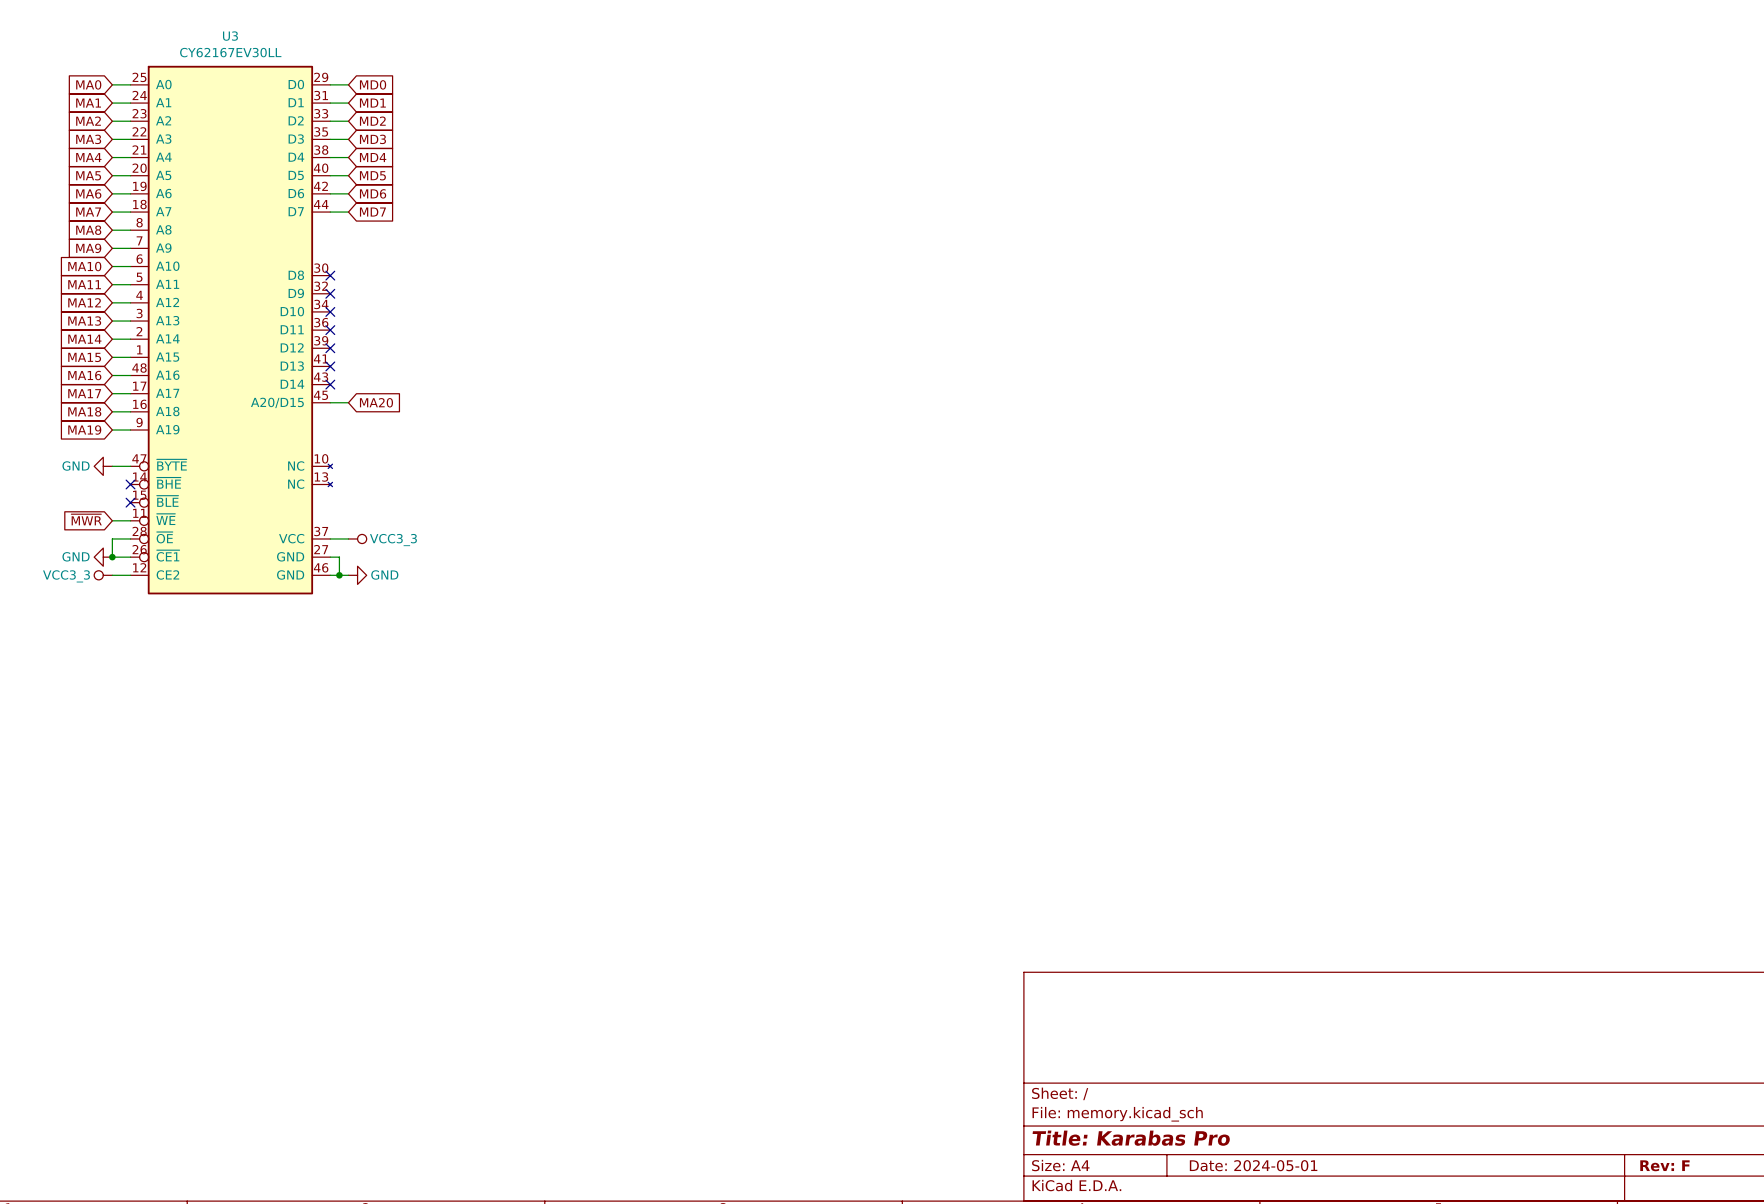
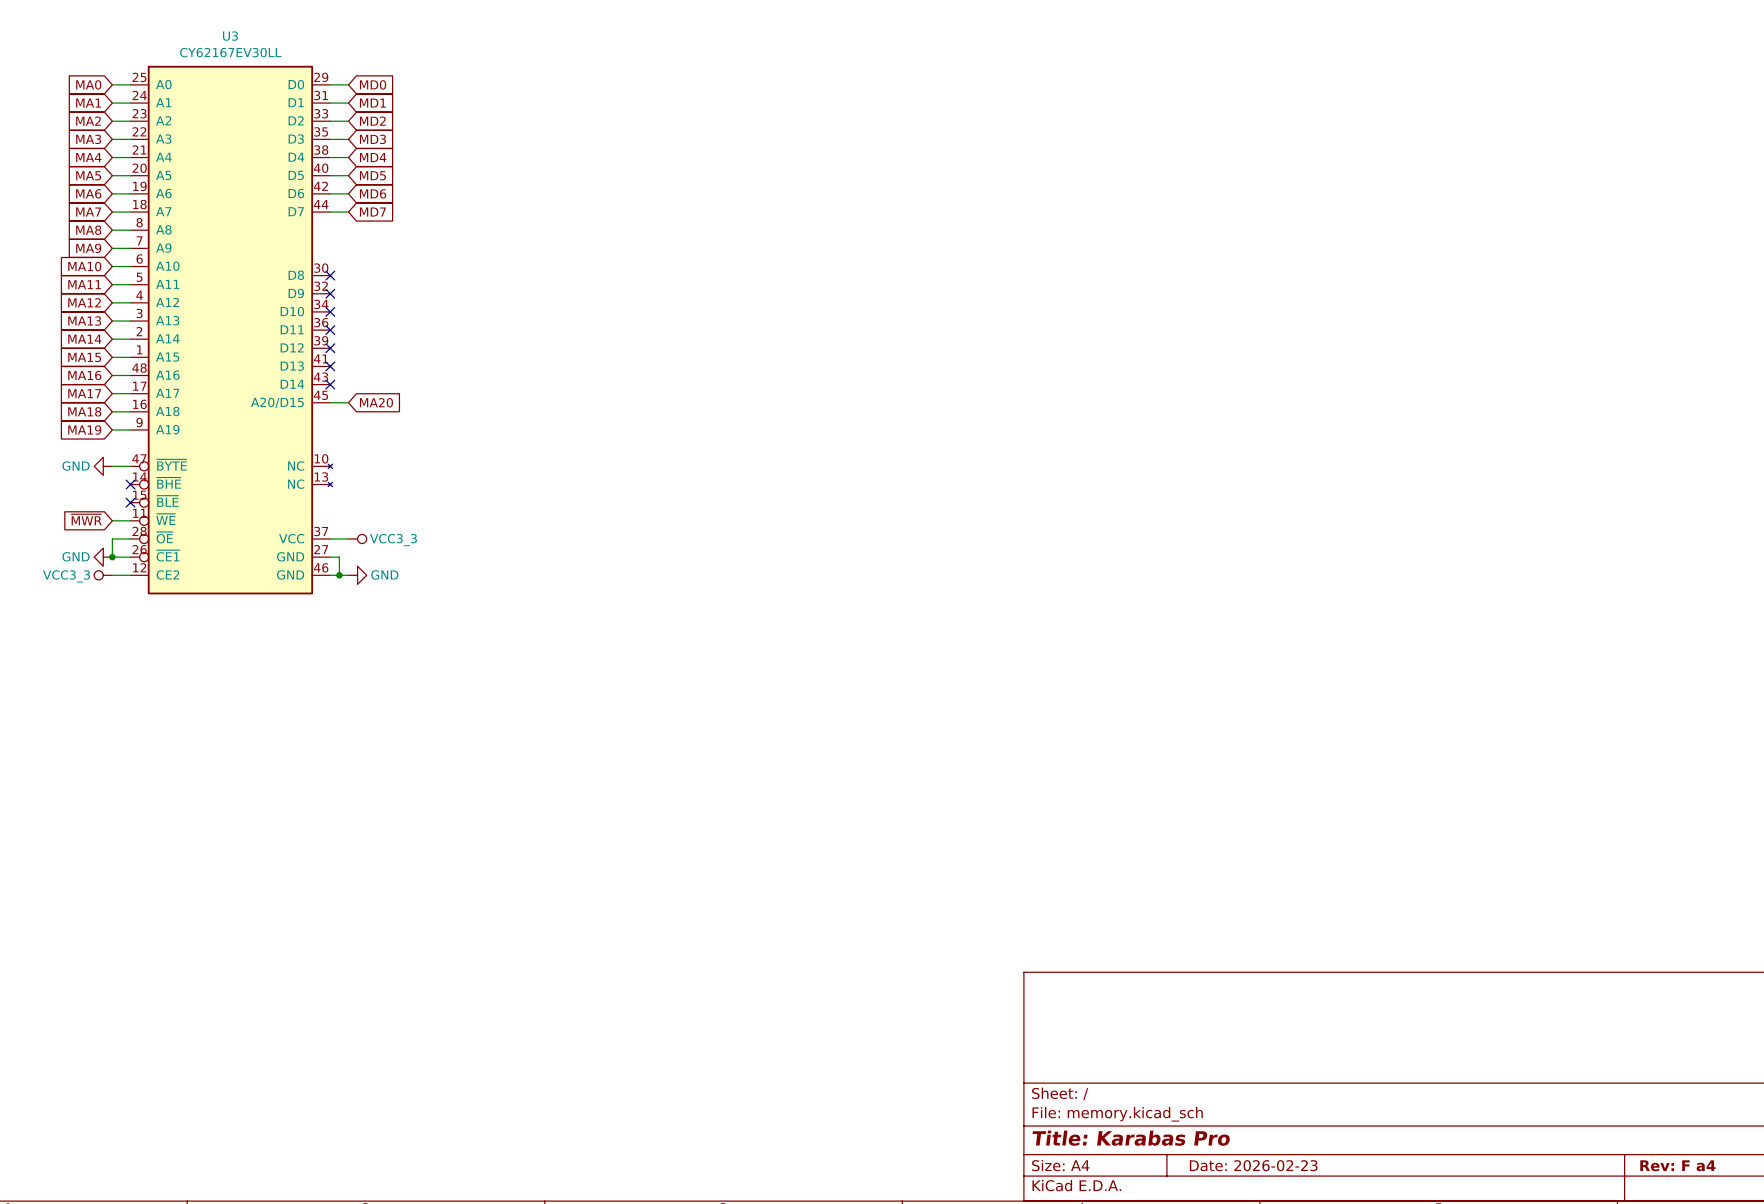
title block: Date: 2024-05-01 (1253, 1165) -> Date: 2026-02-23 (1253, 1165)
title block: Rev: F (1664, 1165) -> Rev: F a4 (1677, 1165)

